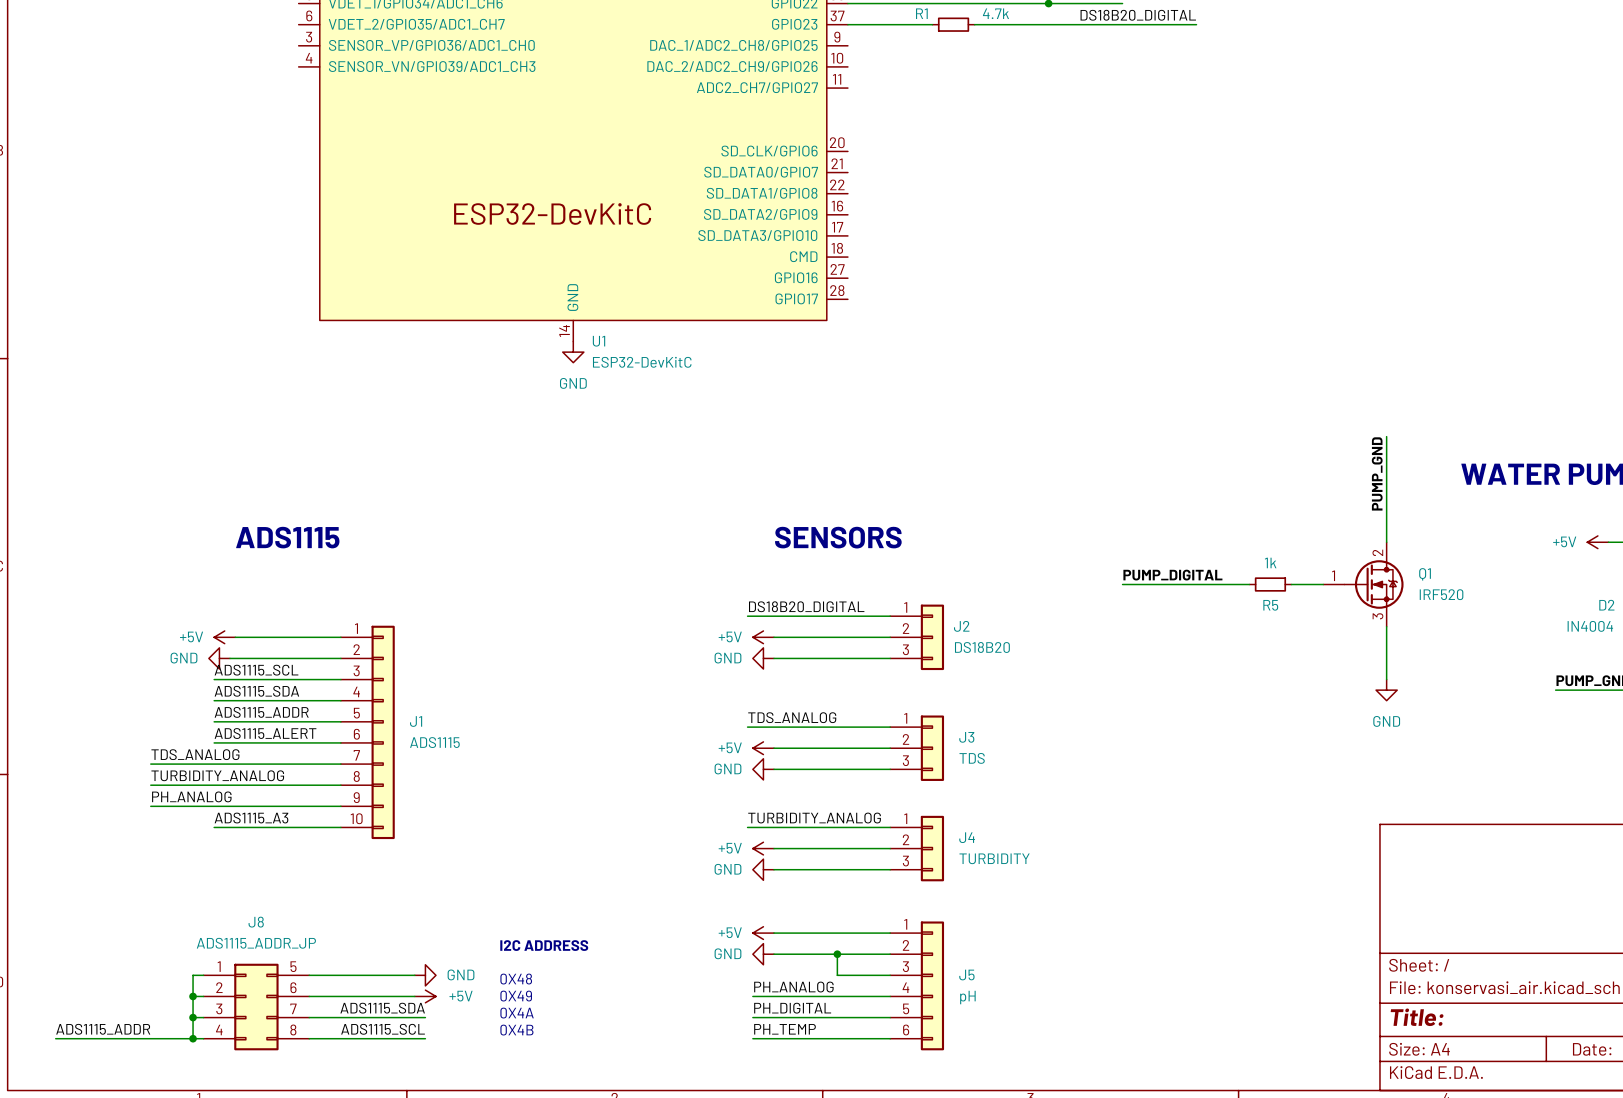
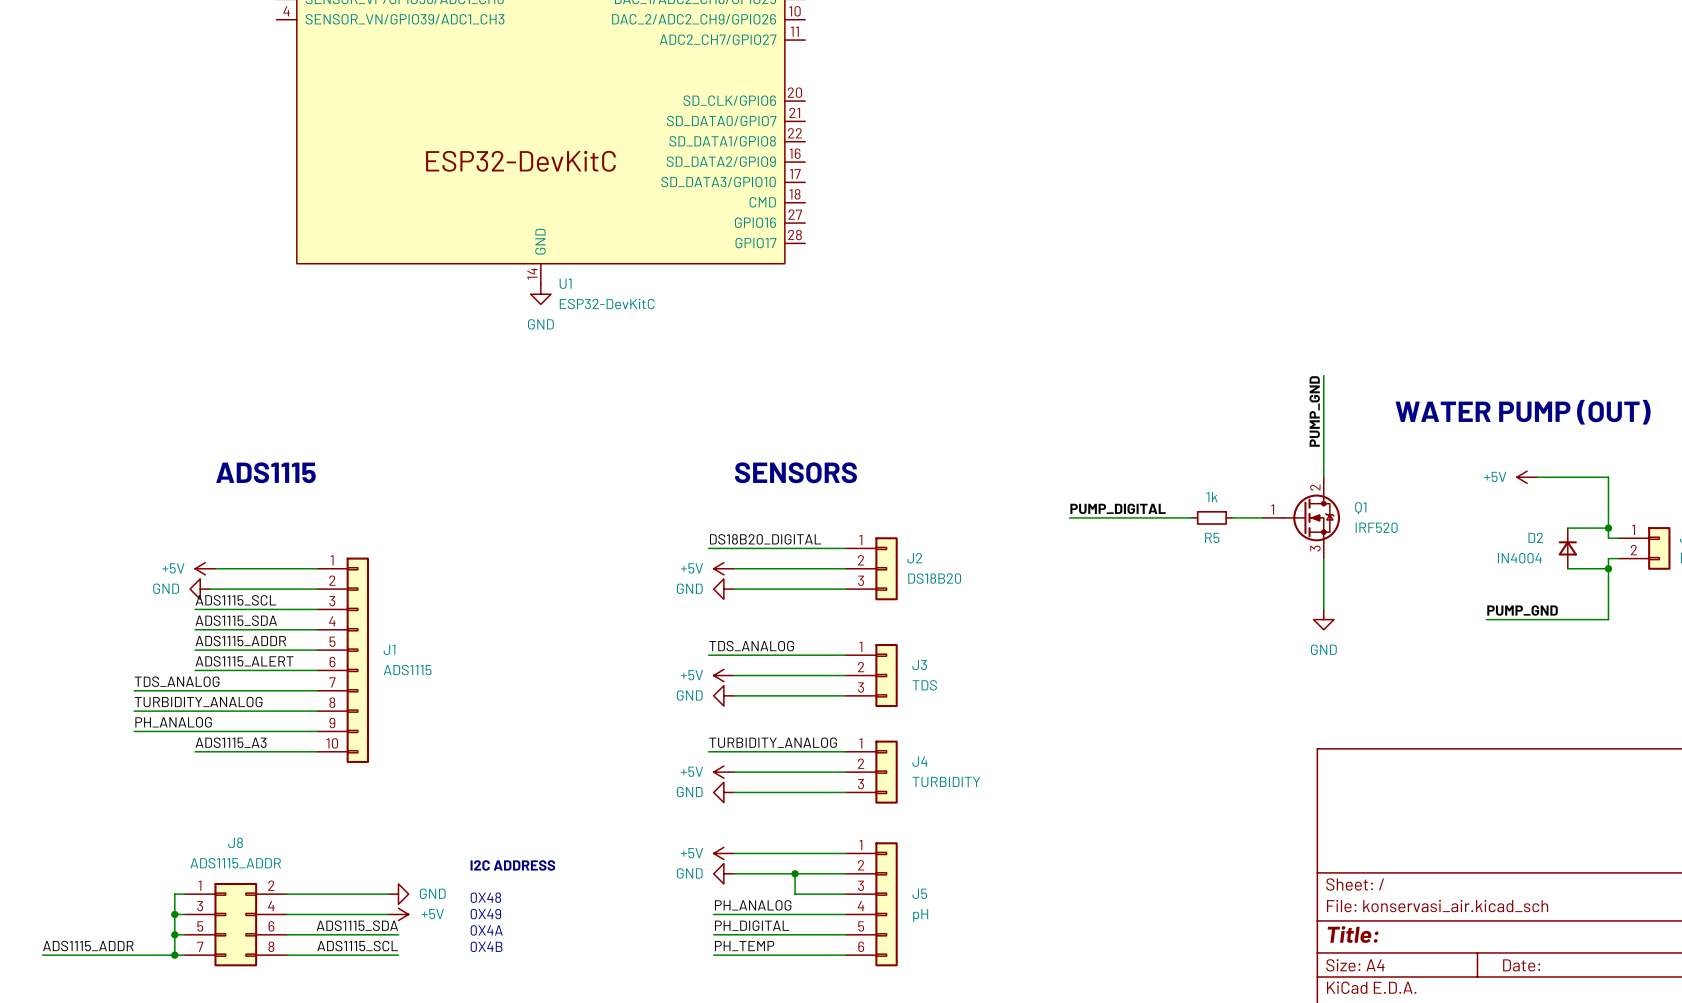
J8 value: ADS1115_ADDR_JP (256, 943) -> ADS1115_ADDR (235, 863)
J8 pin number: 5 (293, 966) -> 2 (271, 885)
J8 pin number: 2 (219, 987) -> 3 (200, 906)
J8 pin number: 6 (293, 987) -> 4 (271, 906)
J8 pin number: 3 (219, 1008) -> 5 (200, 926)
J8 pin number: 7 (293, 1008) -> 6 (271, 926)
J8 pin number: 4 (219, 1030) -> 7 (200, 946)

